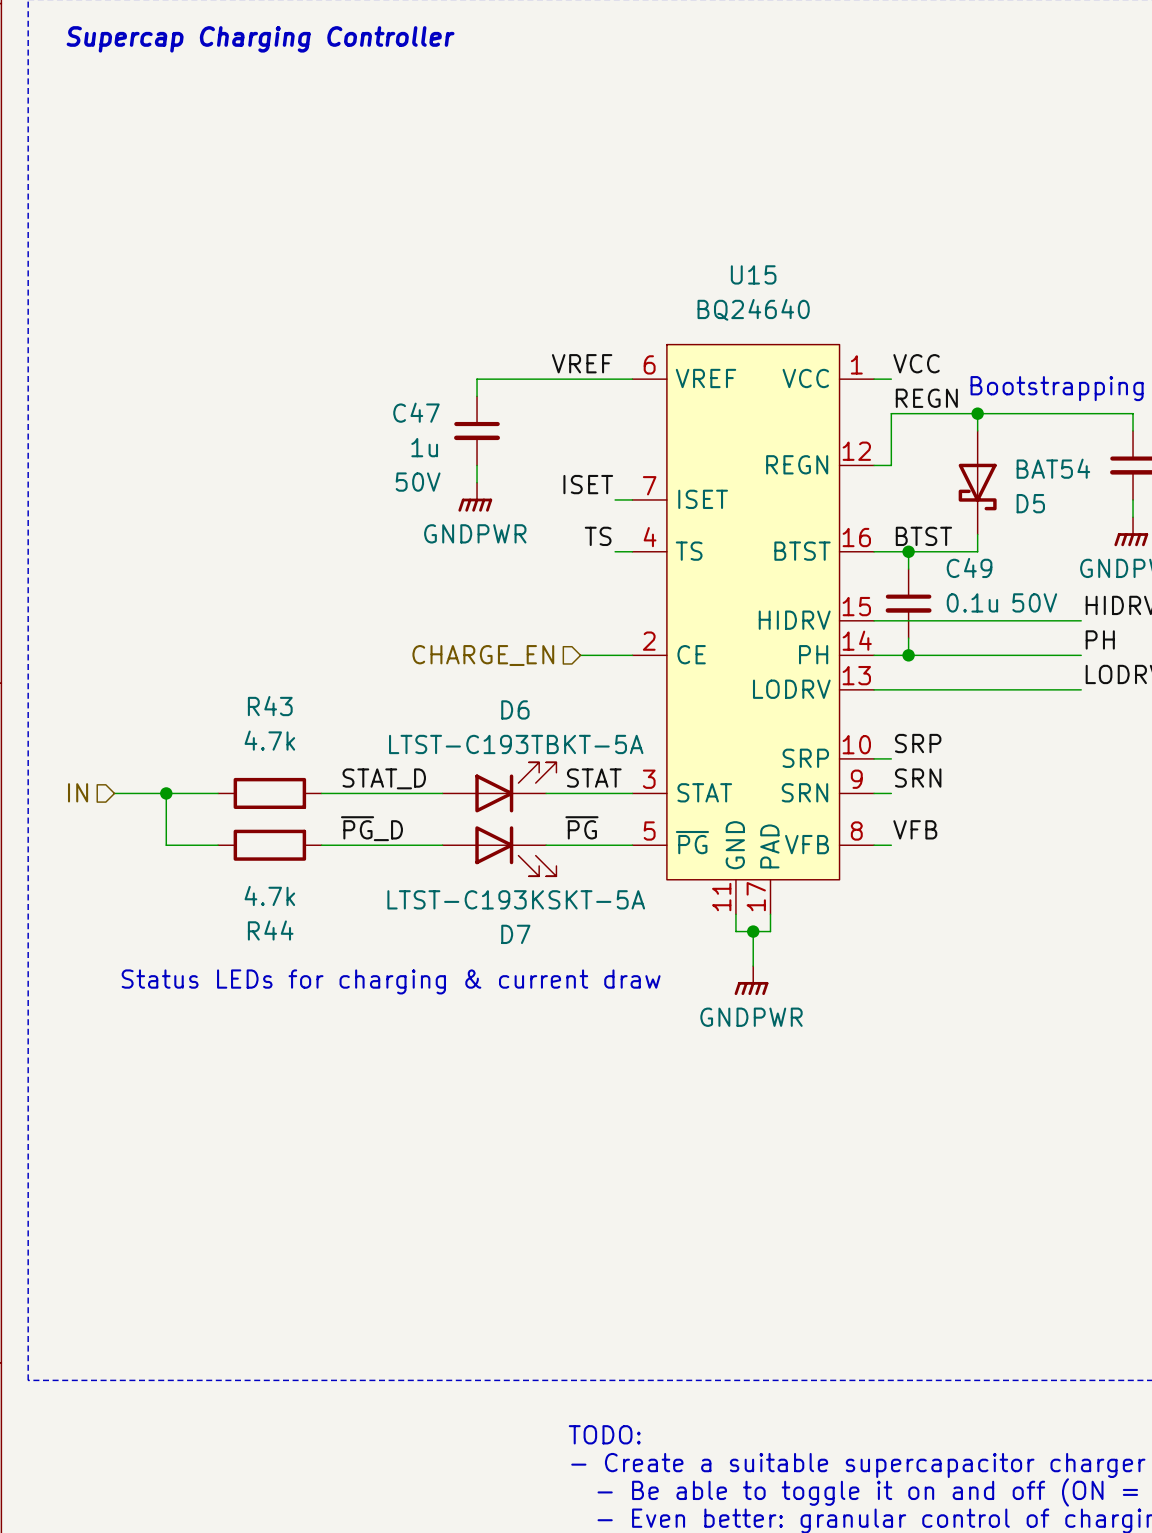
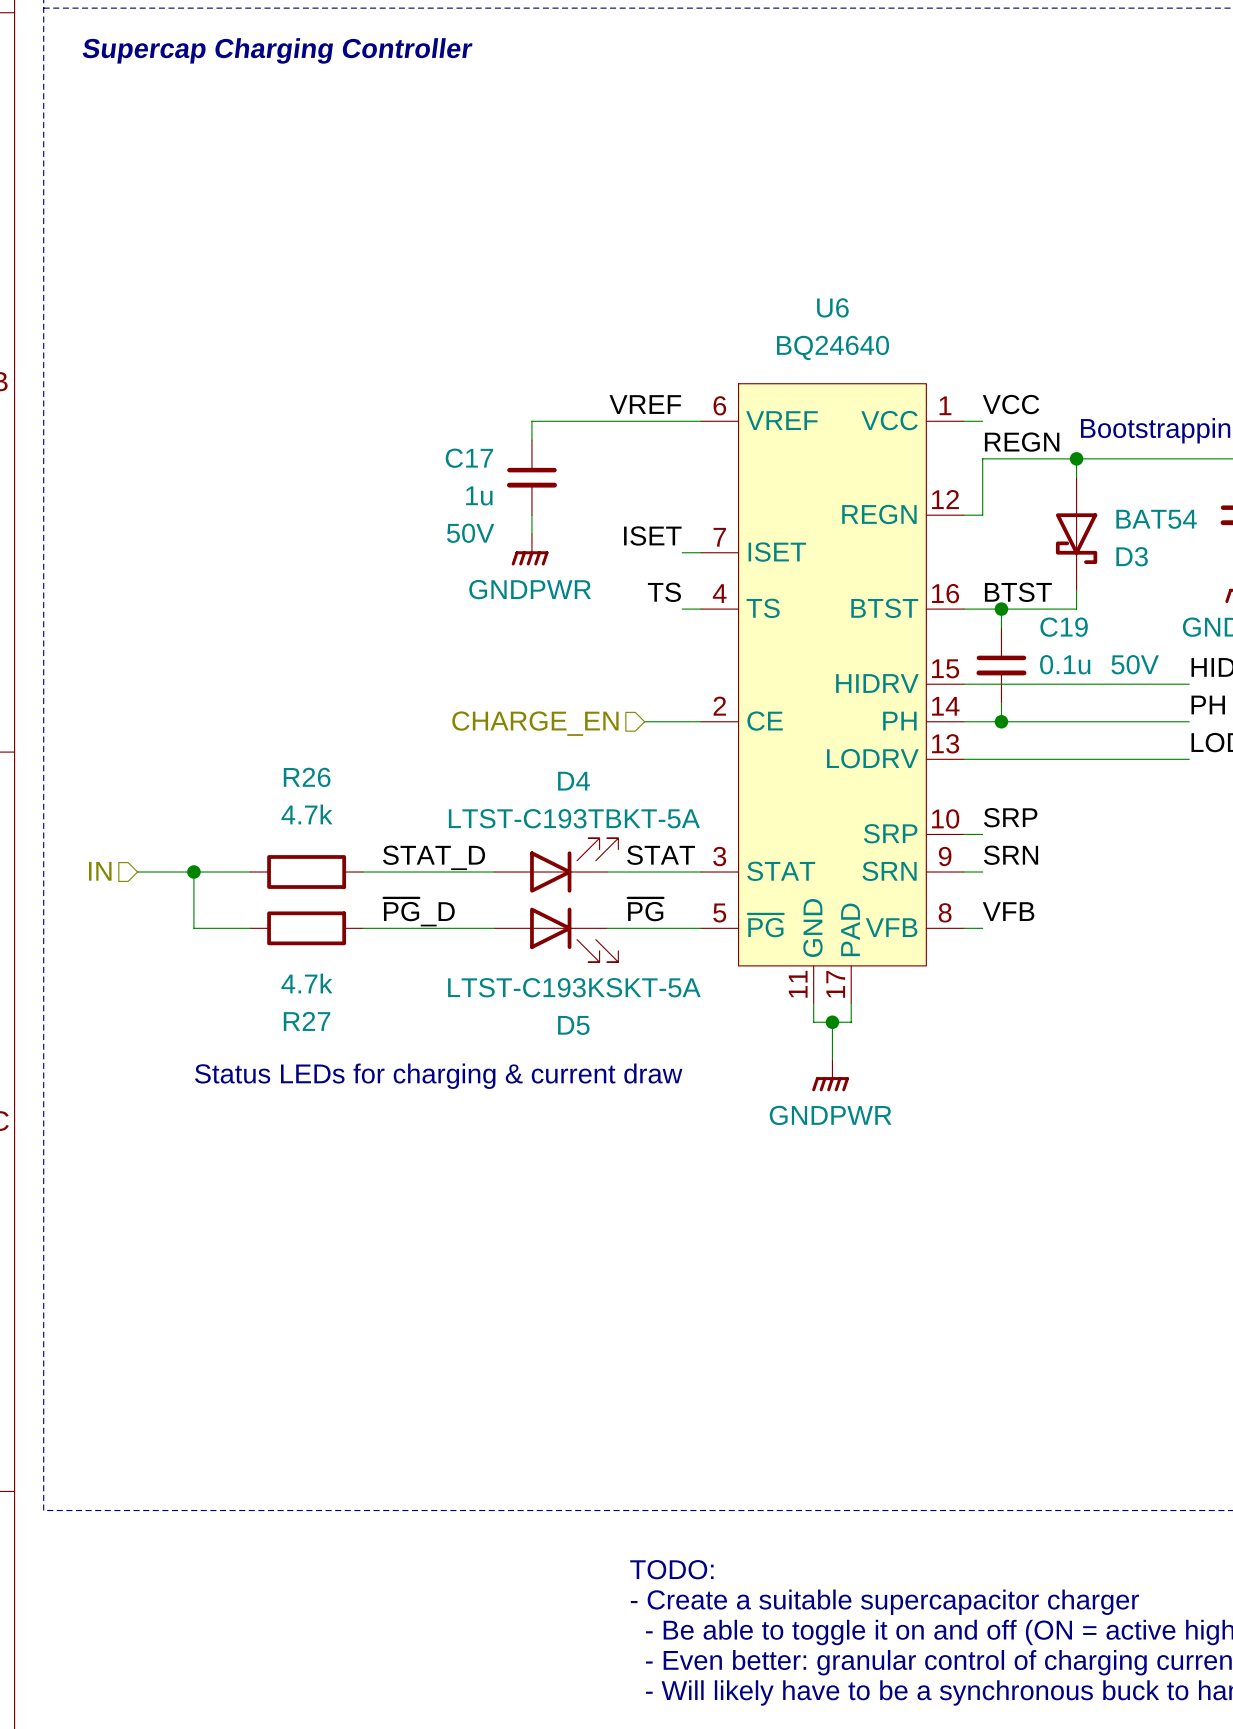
U15 name: U15 (753, 274) -> U6 (832, 307)
C47 name: C47 (416, 412) -> C17 (469, 458)
D5 name: D5 (1030, 503) -> D3 (1132, 556)
C49 name: C49 (969, 567) -> C19 (1064, 627)
R43 name: R43 (270, 706) -> R26 (307, 777)
D6 name: D6 (515, 709) -> D4 (574, 781)
R44 name: R44 (270, 930) -> R27 (307, 1021)
D7 name: D7 (515, 934) -> D5 (573, 1025)

